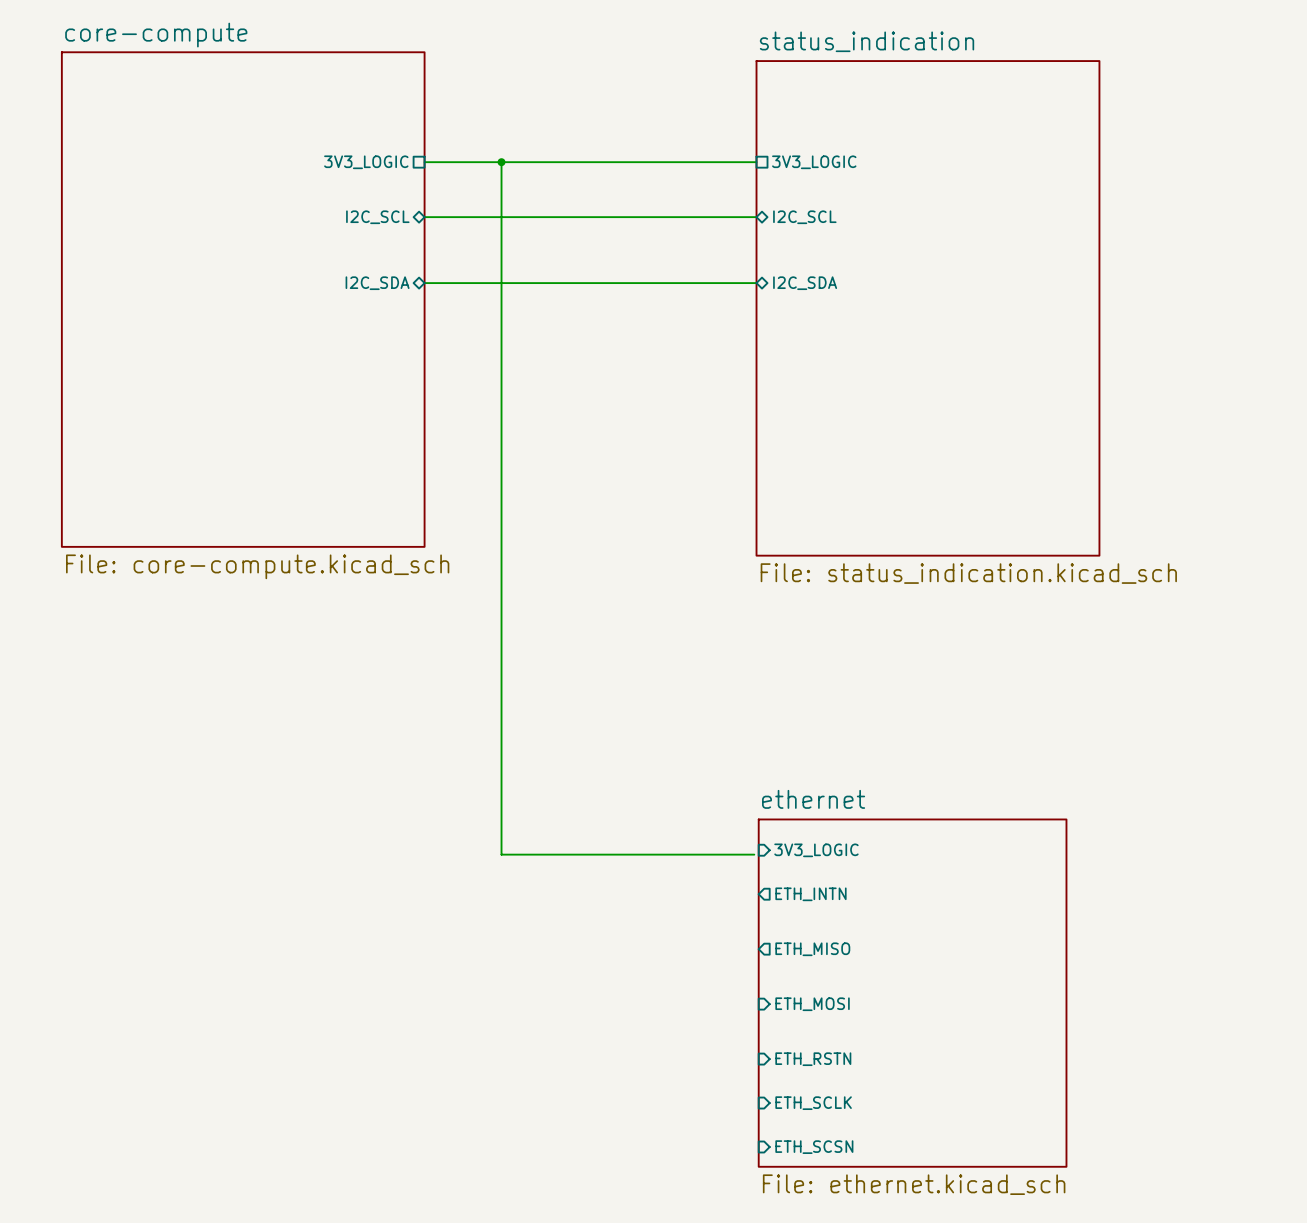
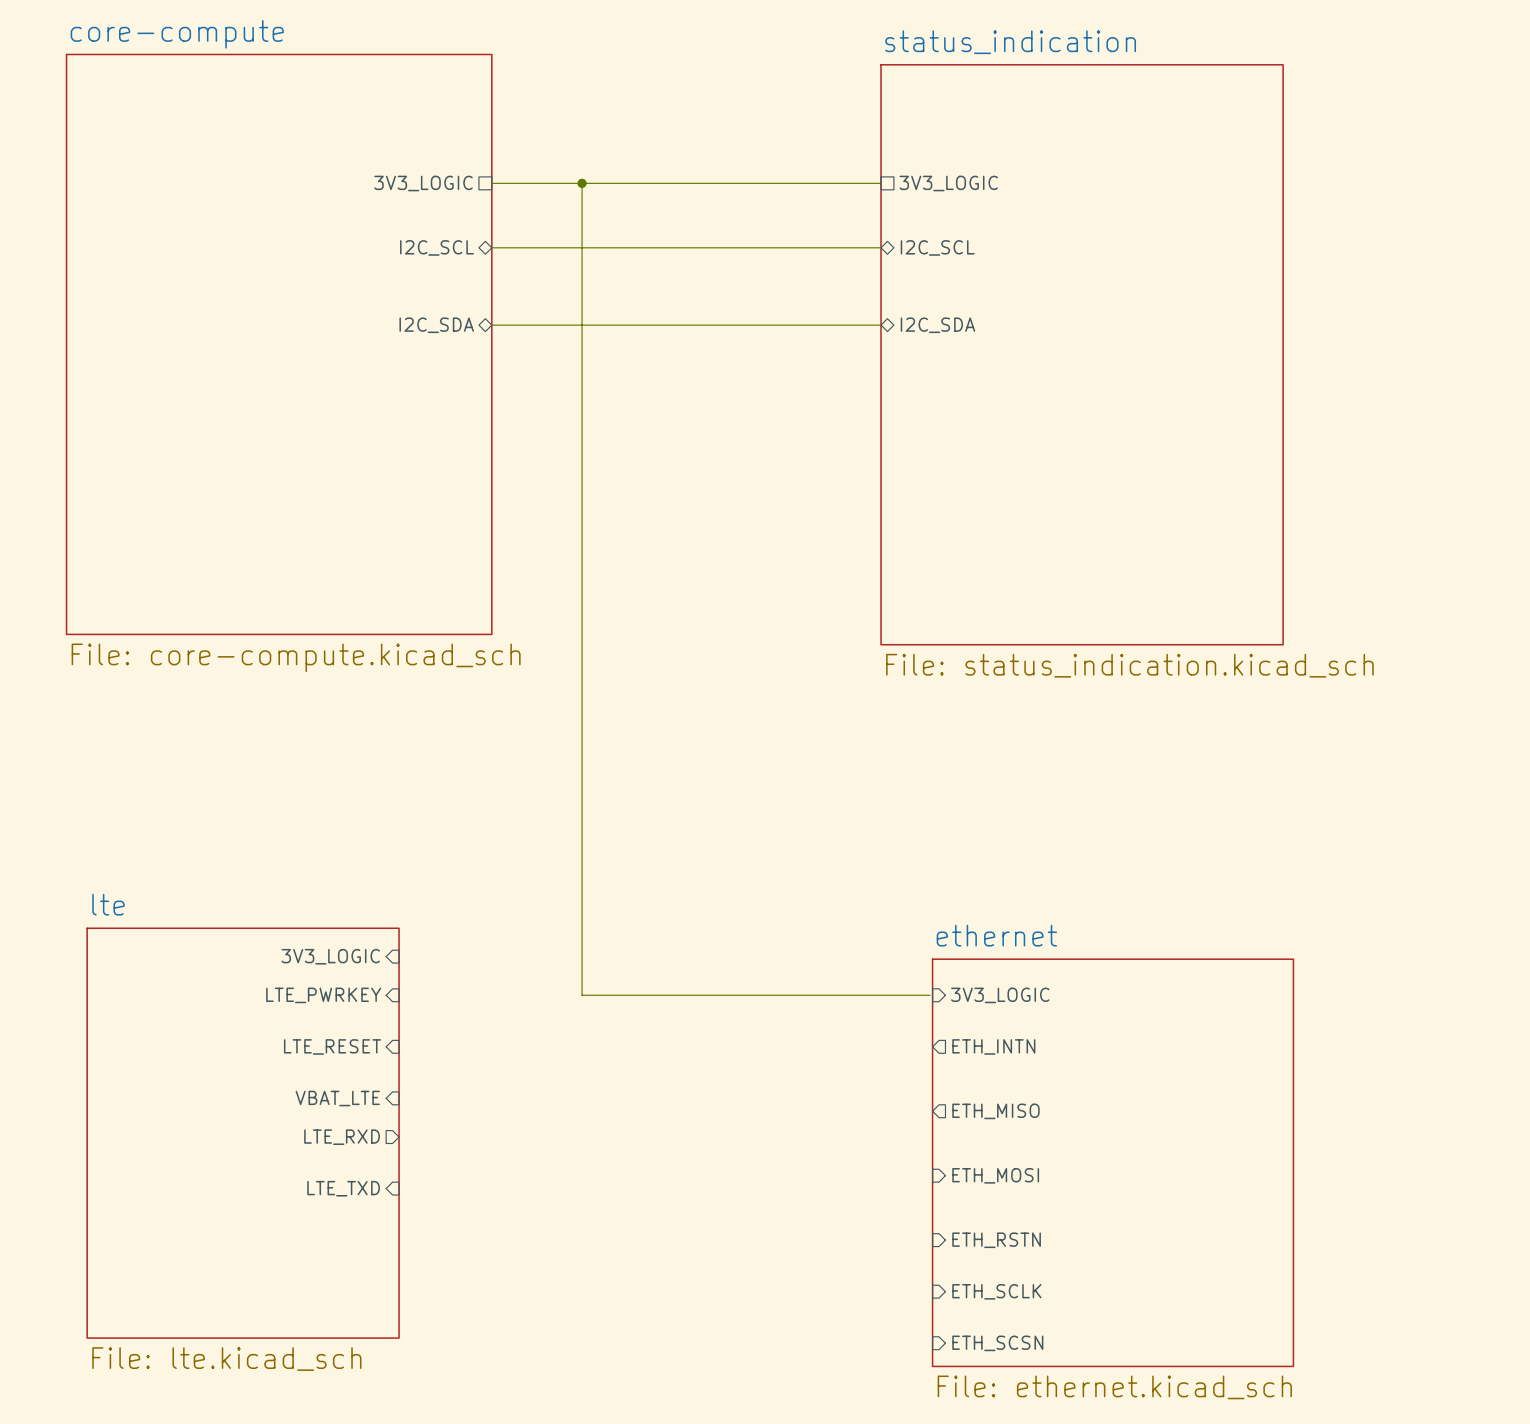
sheet pin: none -> 3V3_LOGIC (330, 956)
sheet pin position: 3V3_LOGIC (816, 850) -> 3V3_LOGIC (1000, 995)
sheet pin: none -> LTE_PWRKEY (323, 995)
wire: none -> (878, 995) (930, 995)
sheet pin position: ETH_INTN (810, 894) -> ETH_INTN (993, 1046)
sheet pin: none -> LTE_RESET (332, 1046)
sheet pin: none -> VBAT_LTE (337, 1098)
sheet pin position: ETH_MISO (812, 949) -> ETH_MISO (995, 1111)
sheet lte: none -> File: lte.kicad_sch (243, 1133)
sheet pin: none -> LTE_RXD (342, 1137)
sheet ethernet position: (912, 993) -> (1113, 1162)
sheet pin position: ETH_MOSI (812, 1004) -> ETH_MOSI (995, 1175)
sheet pin: none -> LTE_TXD (343, 1188)
sheet pin position: ETH_RSTN (813, 1059) -> ETH_RSTN (996, 1240)
sheet pin position: ETH_SCLK (813, 1103) -> ETH_SCLK (996, 1291)
sheet pin position: ETH_SCSN (814, 1147) -> ETH_SCSN (997, 1343)

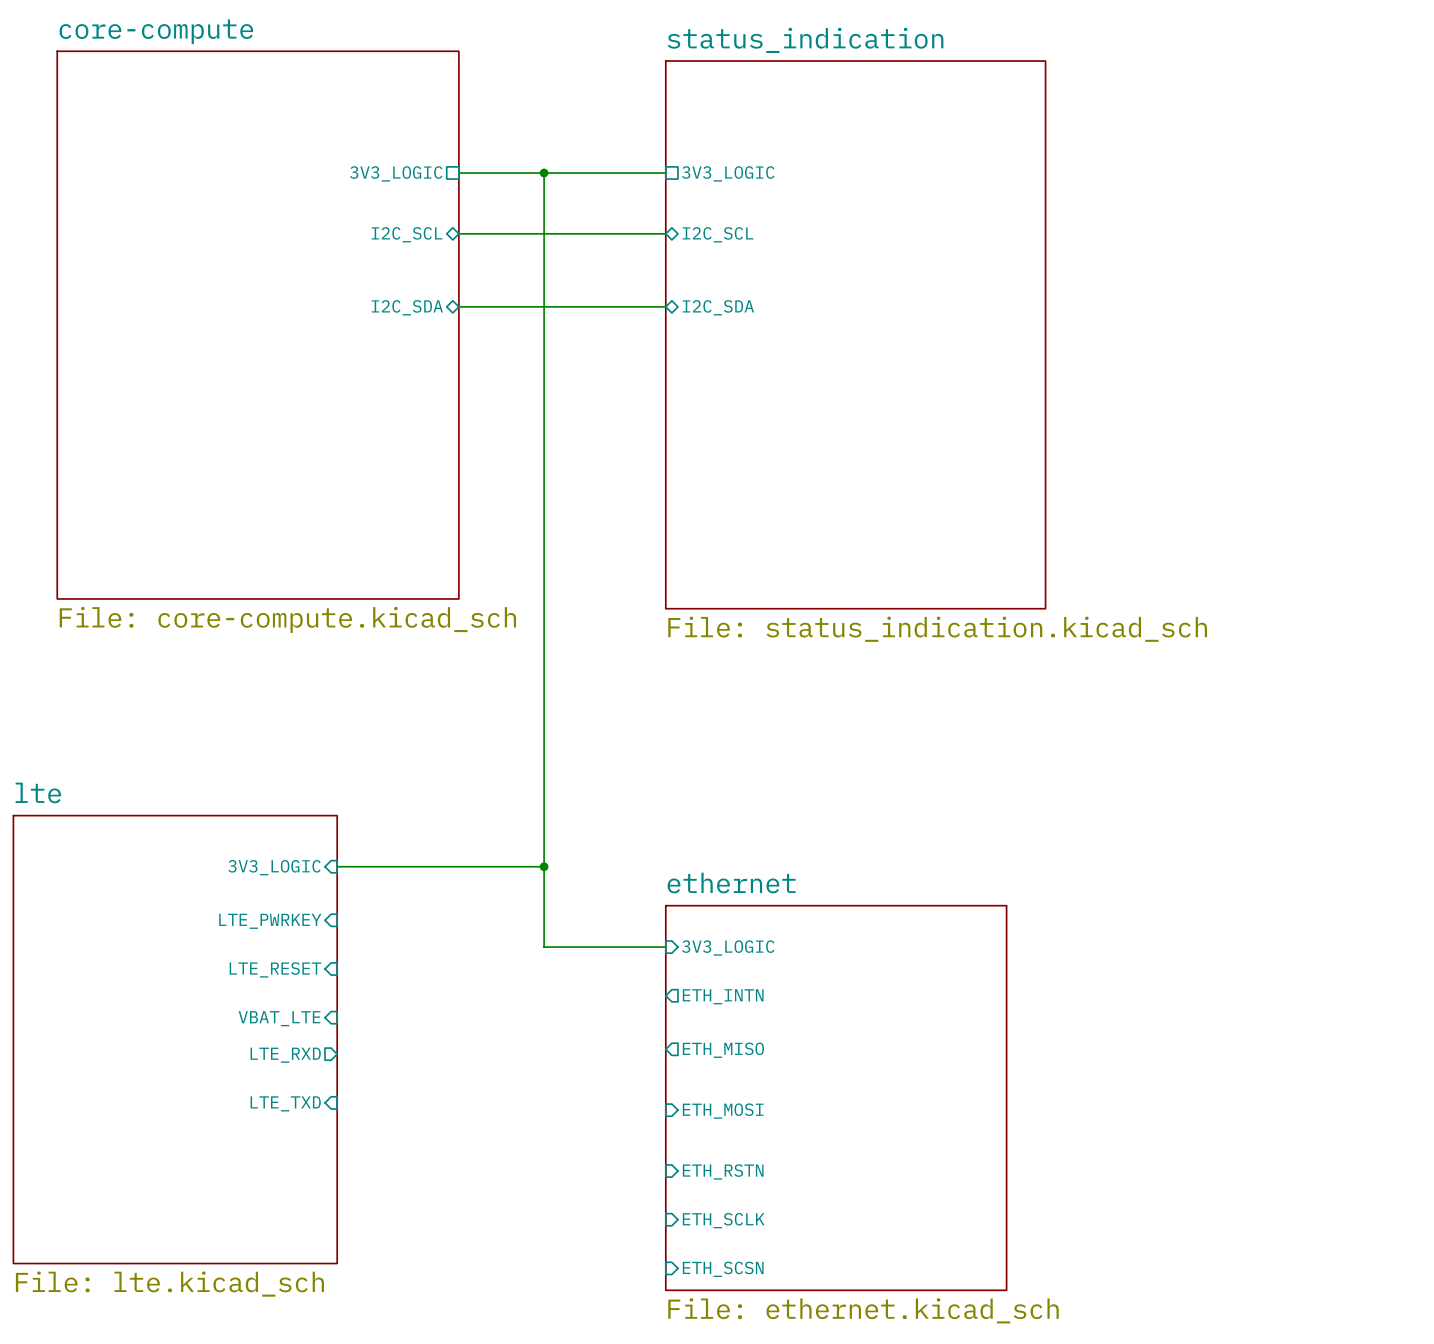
wire: (710, 183) (881, 183) -> none
sheet pin position: 3V3_LOGIC (948, 183) -> 3V3_LOGIC (728, 173)
wire: (710, 247) (881, 247) -> none
sheet pin position: I2C_SCL (937, 247) -> I2C_SCL (718, 234)
wire: (710, 325) (881, 325) -> none
sheet pin position: I2C_SDA (937, 325) -> I2C_SDA (718, 307)
sheet status_indication position: (1082, 354) -> (855, 334)
wire: none -> (337, 866) (544, 866)
junction: none -> (544, 866)
sheet pin position: 3V3_LOGIC (330, 956) -> 3V3_LOGIC (274, 867)
sheet pin position: LTE_PWRKEY (323, 995) -> LTE_PWRKEY (270, 921)
wire: (582, 995) (930, 995) -> (544, 939) (544, 947) (665, 947)
sheet pin: 3V3_LOGIC (1000, 995) -> none
sheet pin: none -> 3V3_LOGIC (728, 947)
sheet pin position: LTE_RESET (332, 1046) -> LTE_RESET (275, 969)
sheet pin position: ETH_INTN (993, 1046) -> ETH_INTN (723, 996)
sheet pin position: VBAT_LTE (337, 1098) -> VBAT_LTE (279, 1018)
sheet lte: none -> File: lte.kicad_sch (175, 1039)
sheet pin position: ETH_MISO (995, 1111) -> ETH_MISO (723, 1050)
sheet lte: File: lte.kicad_sch (243, 1133) -> none
sheet pin position: LTE_RXD (342, 1137) -> LTE_RXD (285, 1055)
sheet ethernet position: (1113, 1162) -> (836, 1098)
sheet pin position: ETH_MOSI (995, 1175) -> ETH_MOSI (723, 1111)
sheet pin position: LTE_TXD (343, 1188) -> LTE_TXD (285, 1103)
sheet pin position: ETH_RSTN (996, 1240) -> ETH_RSTN (723, 1171)
sheet pin position: ETH_SCLK (996, 1291) -> ETH_SCLK (723, 1220)
sheet pin position: ETH_SCSN (997, 1343) -> ETH_SCSN (723, 1269)

